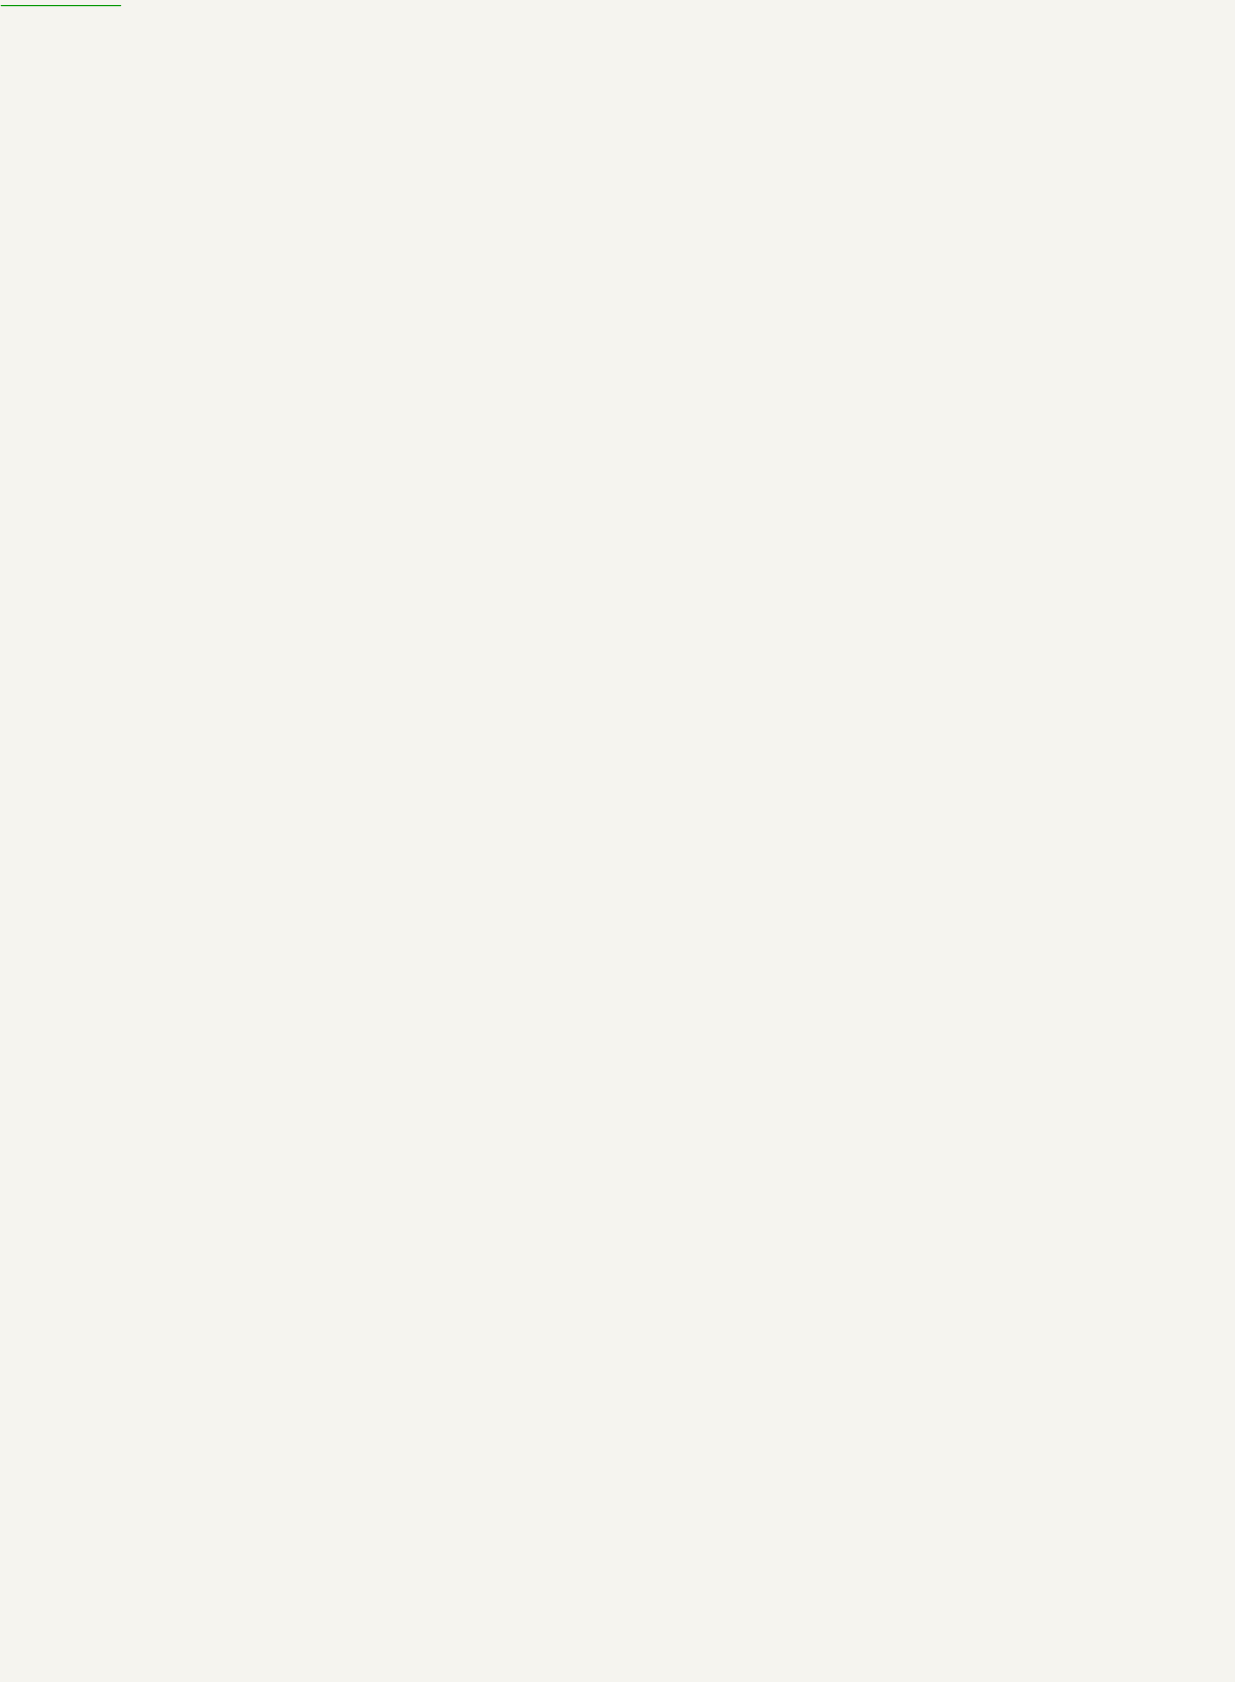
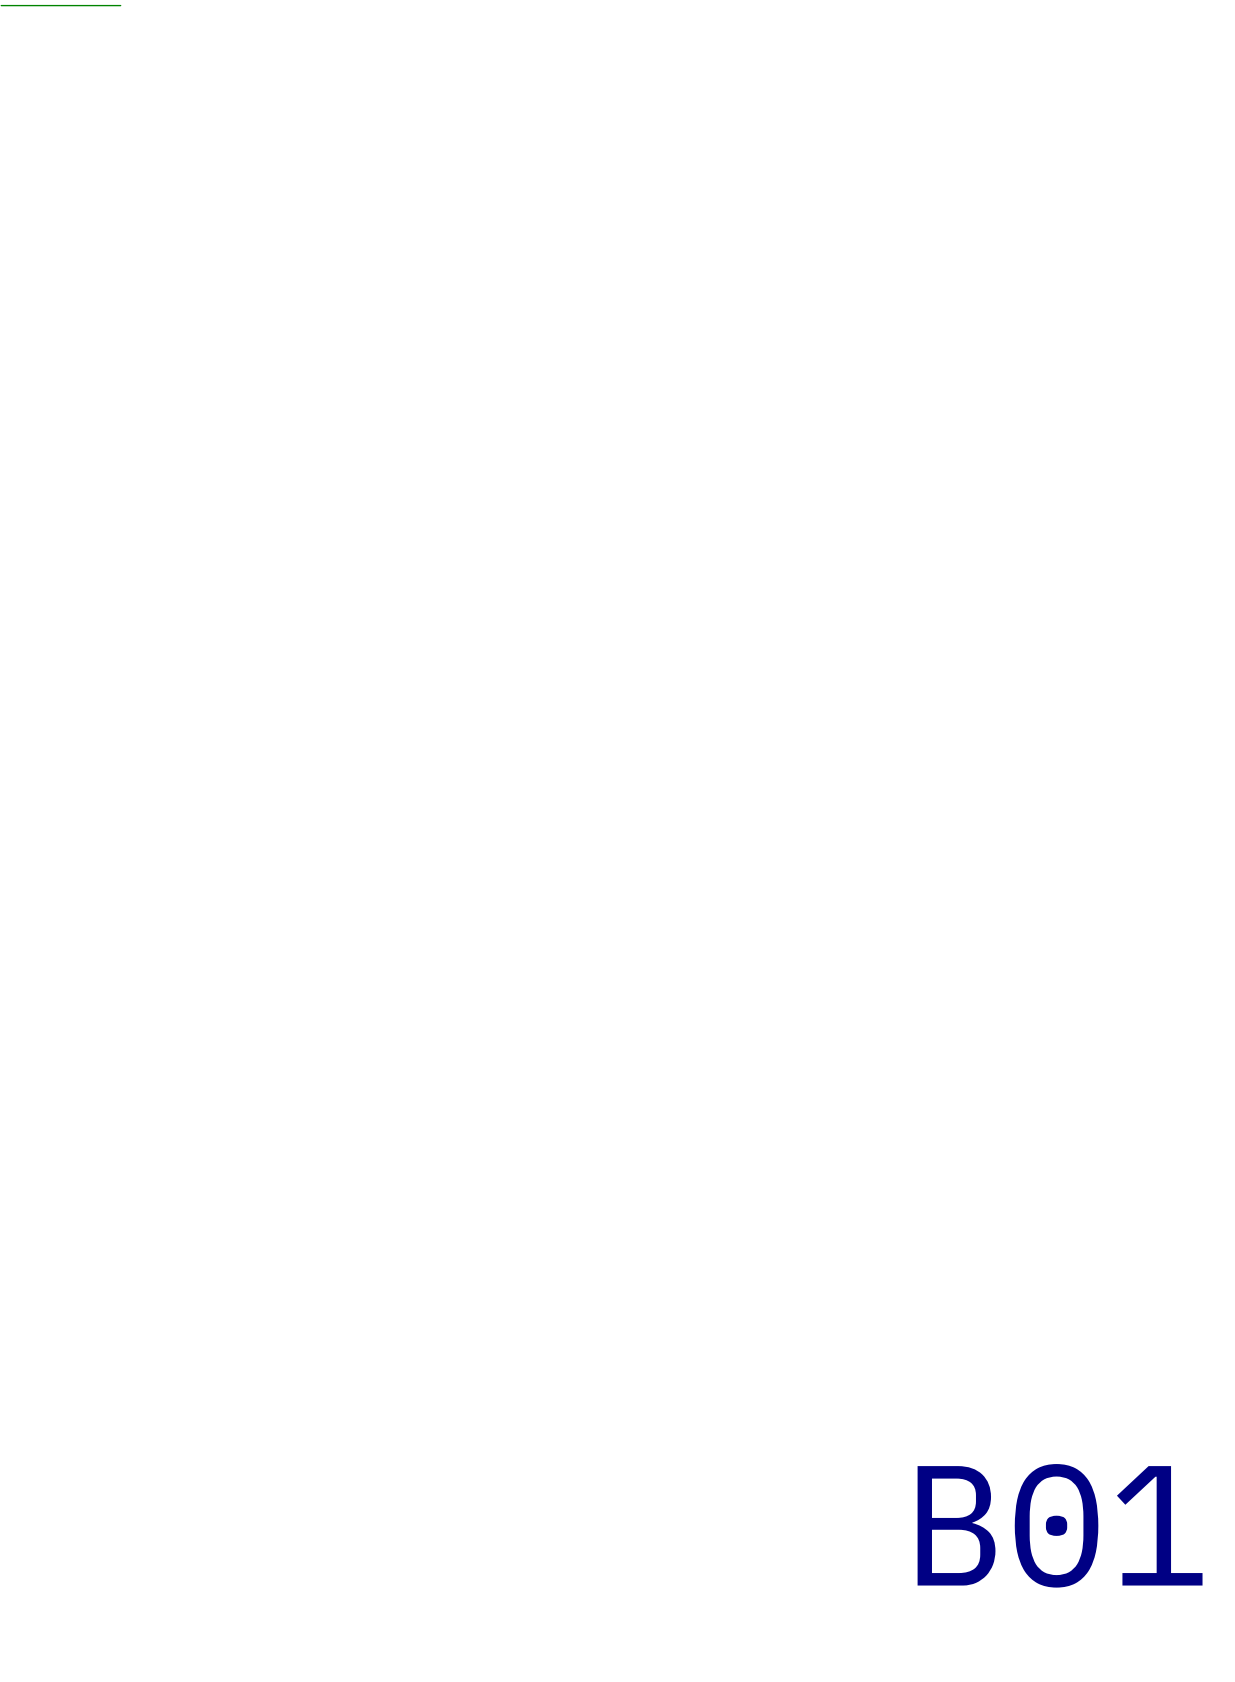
text: none -> B01 (1060, 1525)

